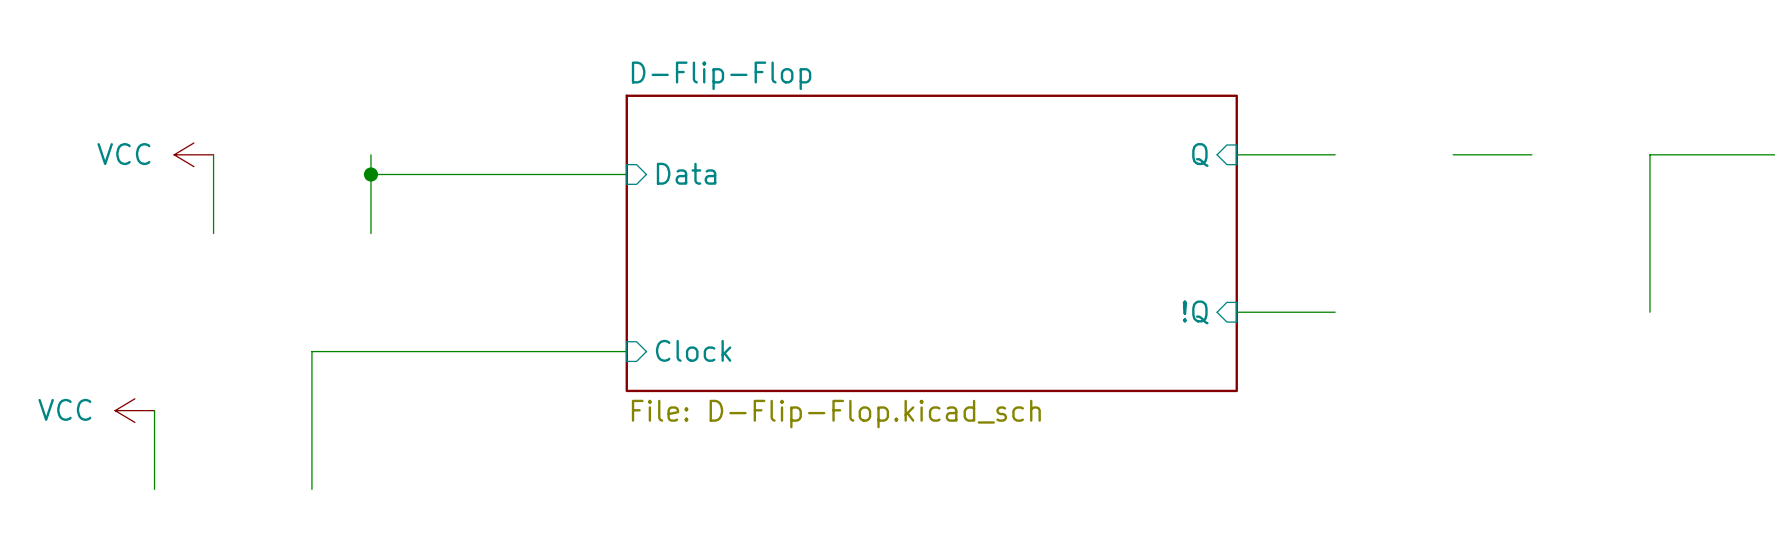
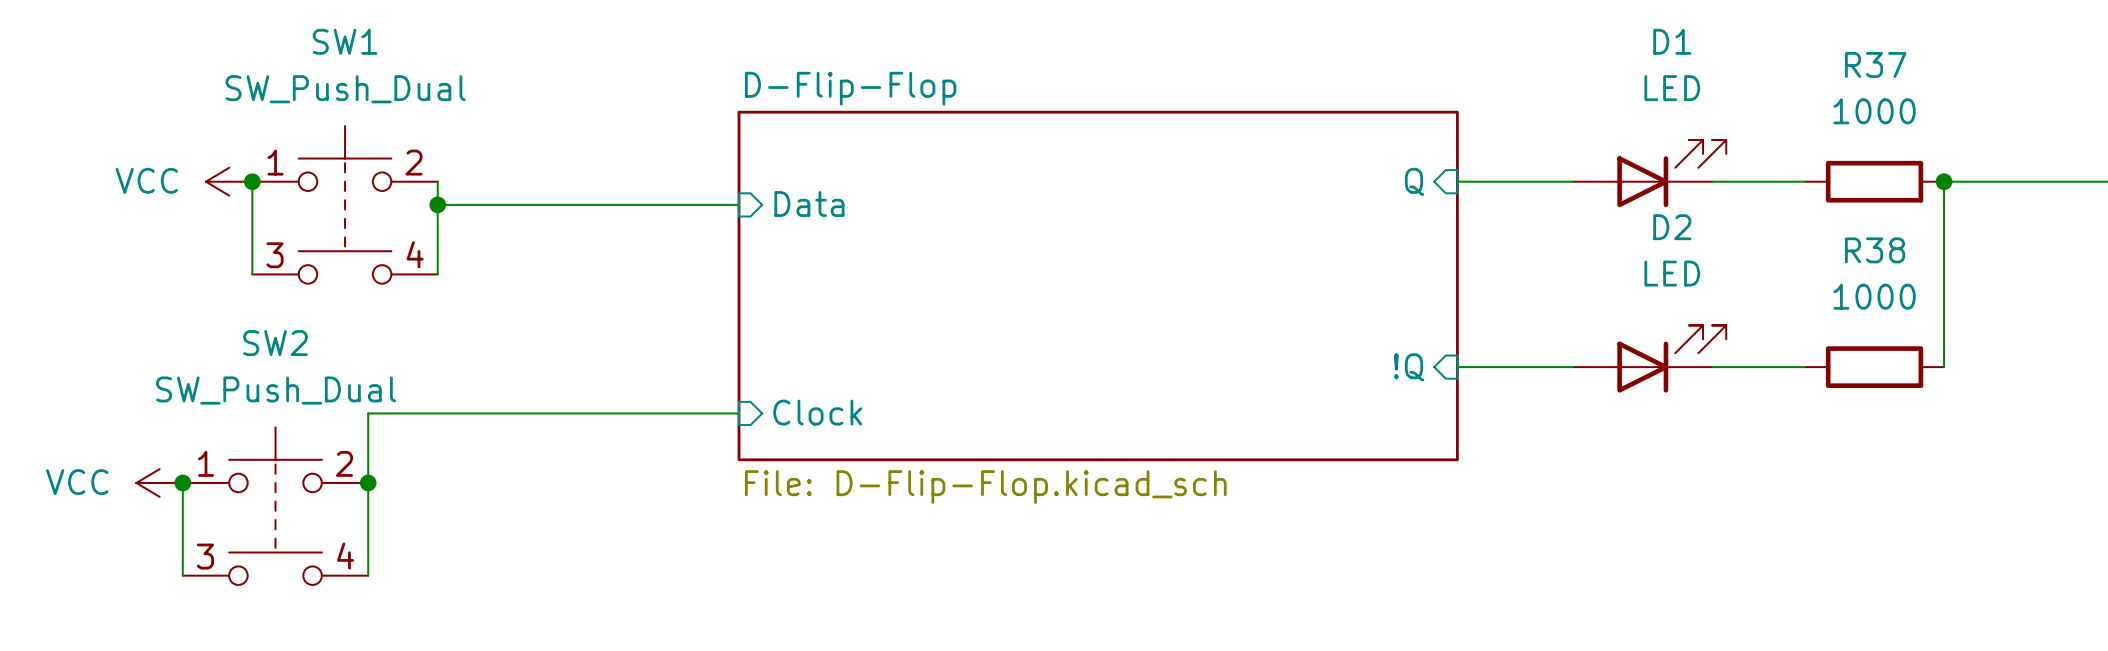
D1: none -> LED (1649, 173)
junction: none -> (252, 181)
R37: none -> 1000 (1874, 181)
junction: none -> (1944, 181)
SW1: none -> SW_Push_Dual (345, 204)
D2: none -> LED (1649, 358)
wire: none -> (1712, 367) (1805, 367)
R38: none -> 1000 (1874, 367)
junction: none -> (182, 482)
junction: none -> (368, 482)
SW2: none -> SW_Push_Dual (275, 506)

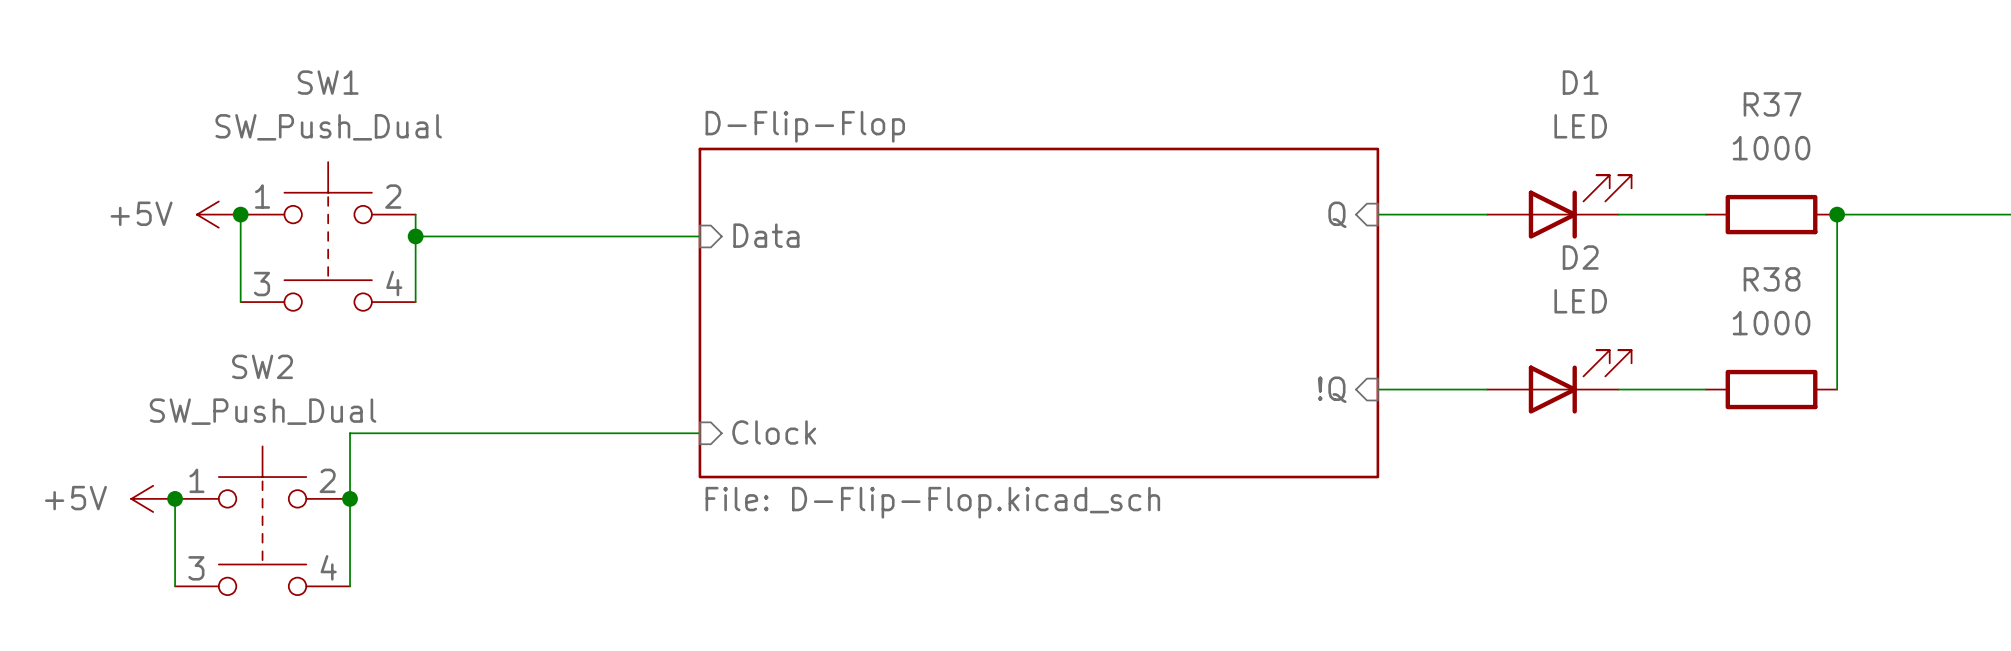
power symbol: VCC (229, 181) -> +5V (218, 214)
power symbol: VCC (159, 482) -> +5V (153, 498)

